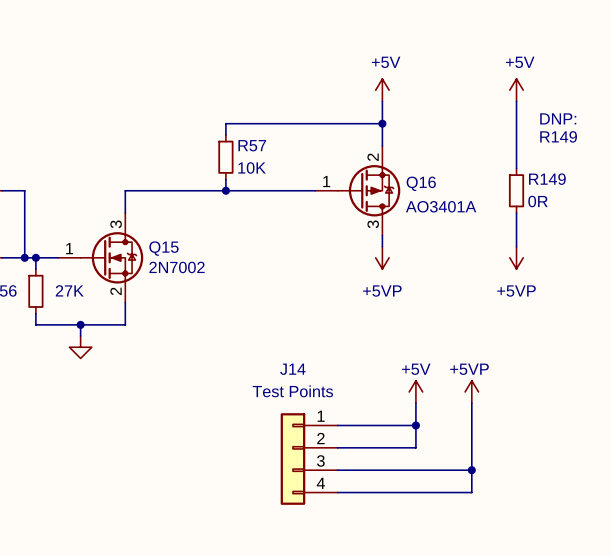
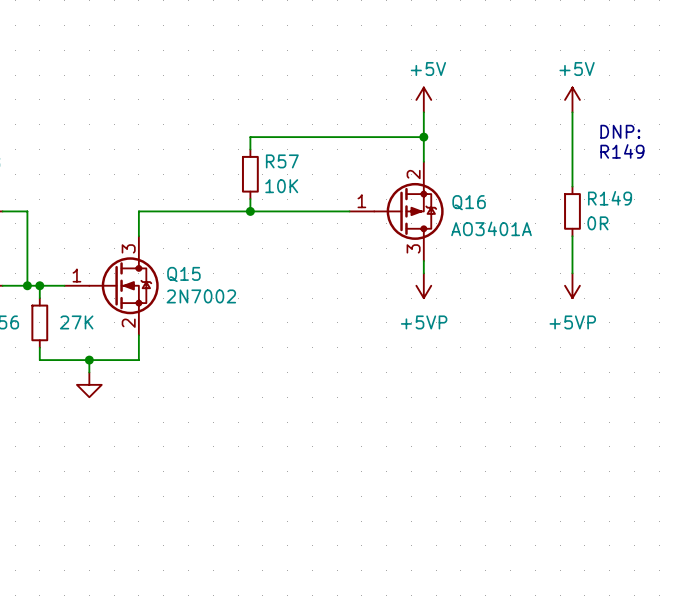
power symbol: +5V (415, 391) -> none
power symbol: +5VP (471, 391) -> none
wire: (415, 403) (415, 447) (337, 447) -> none
wire: (471, 403) (471, 492) (337, 492) -> none
wire: (337, 425) (415, 425) -> none
junction: (415, 425) -> none
J14: Test Points (309, 459) -> none
wire: (337, 470) (471, 470) -> none
junction: (471, 470) -> none

